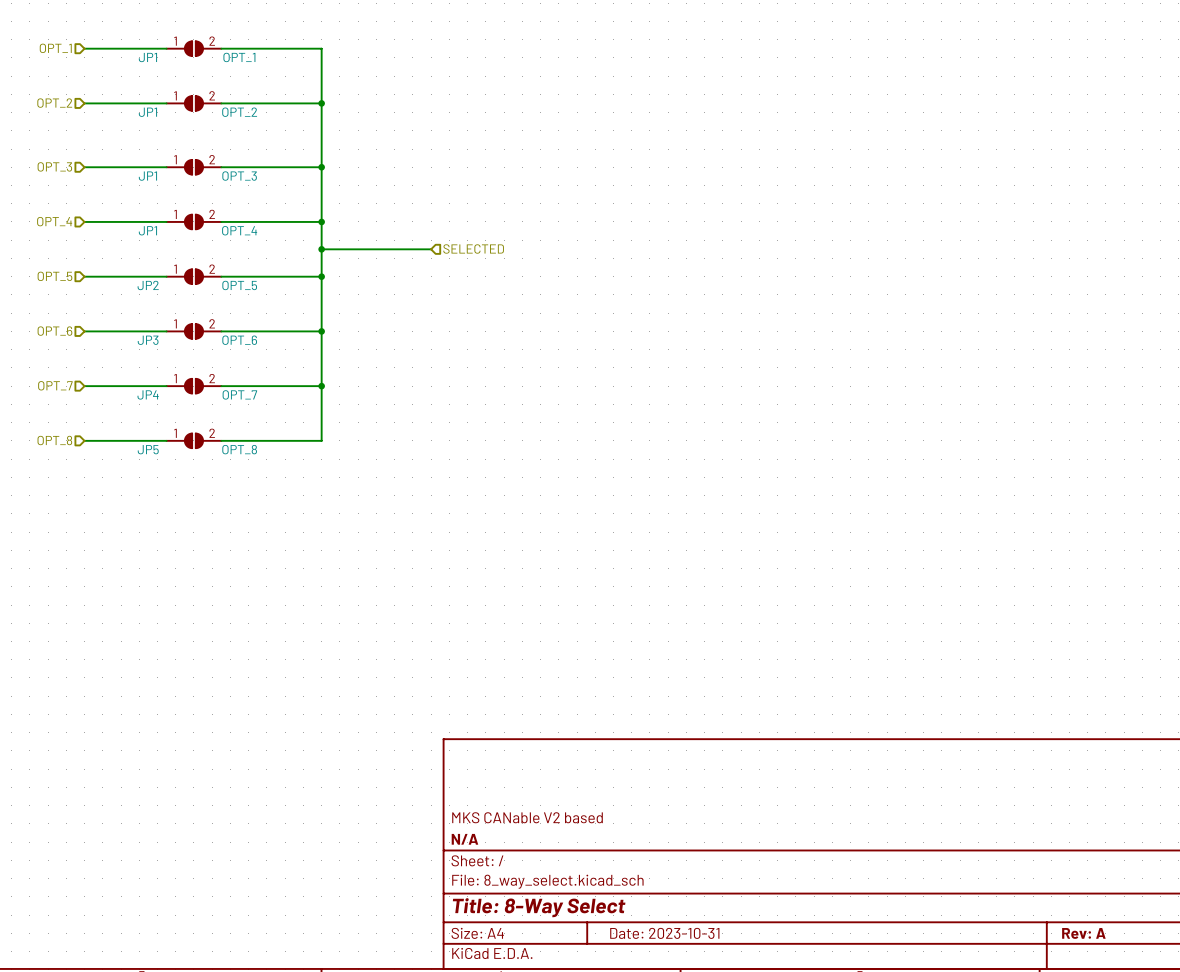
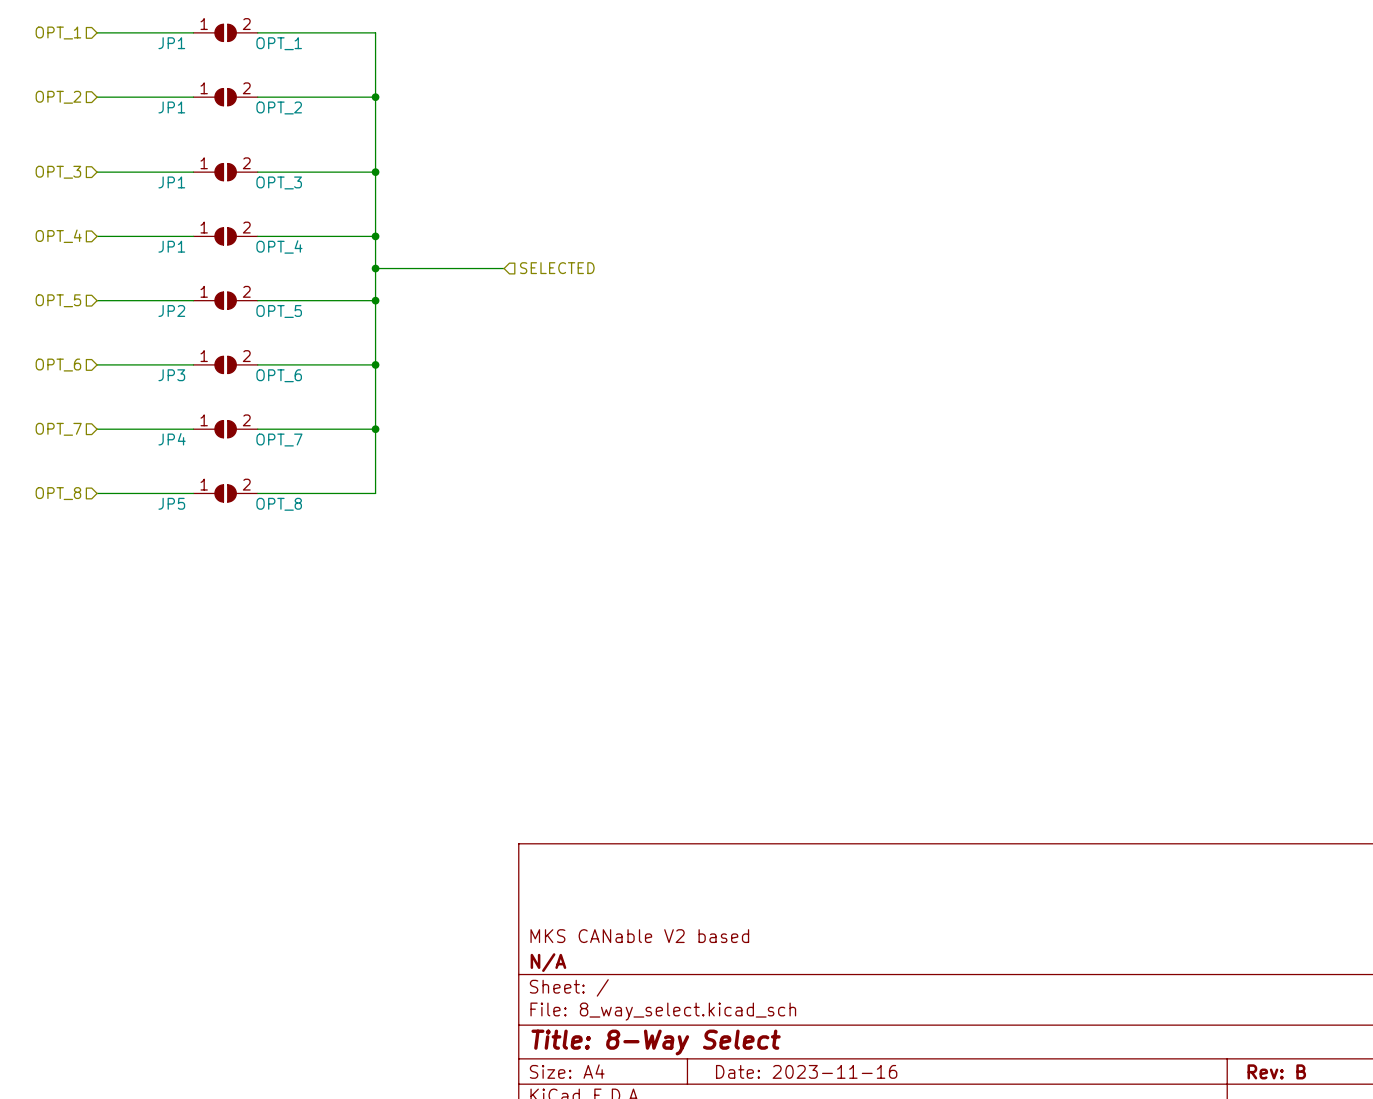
title block: Date: 2023-10-31 (664, 933) -> Date: 2023-11-16 (806, 1071)
title block: Rev: A (1083, 933) -> Rev: B (1276, 1071)

